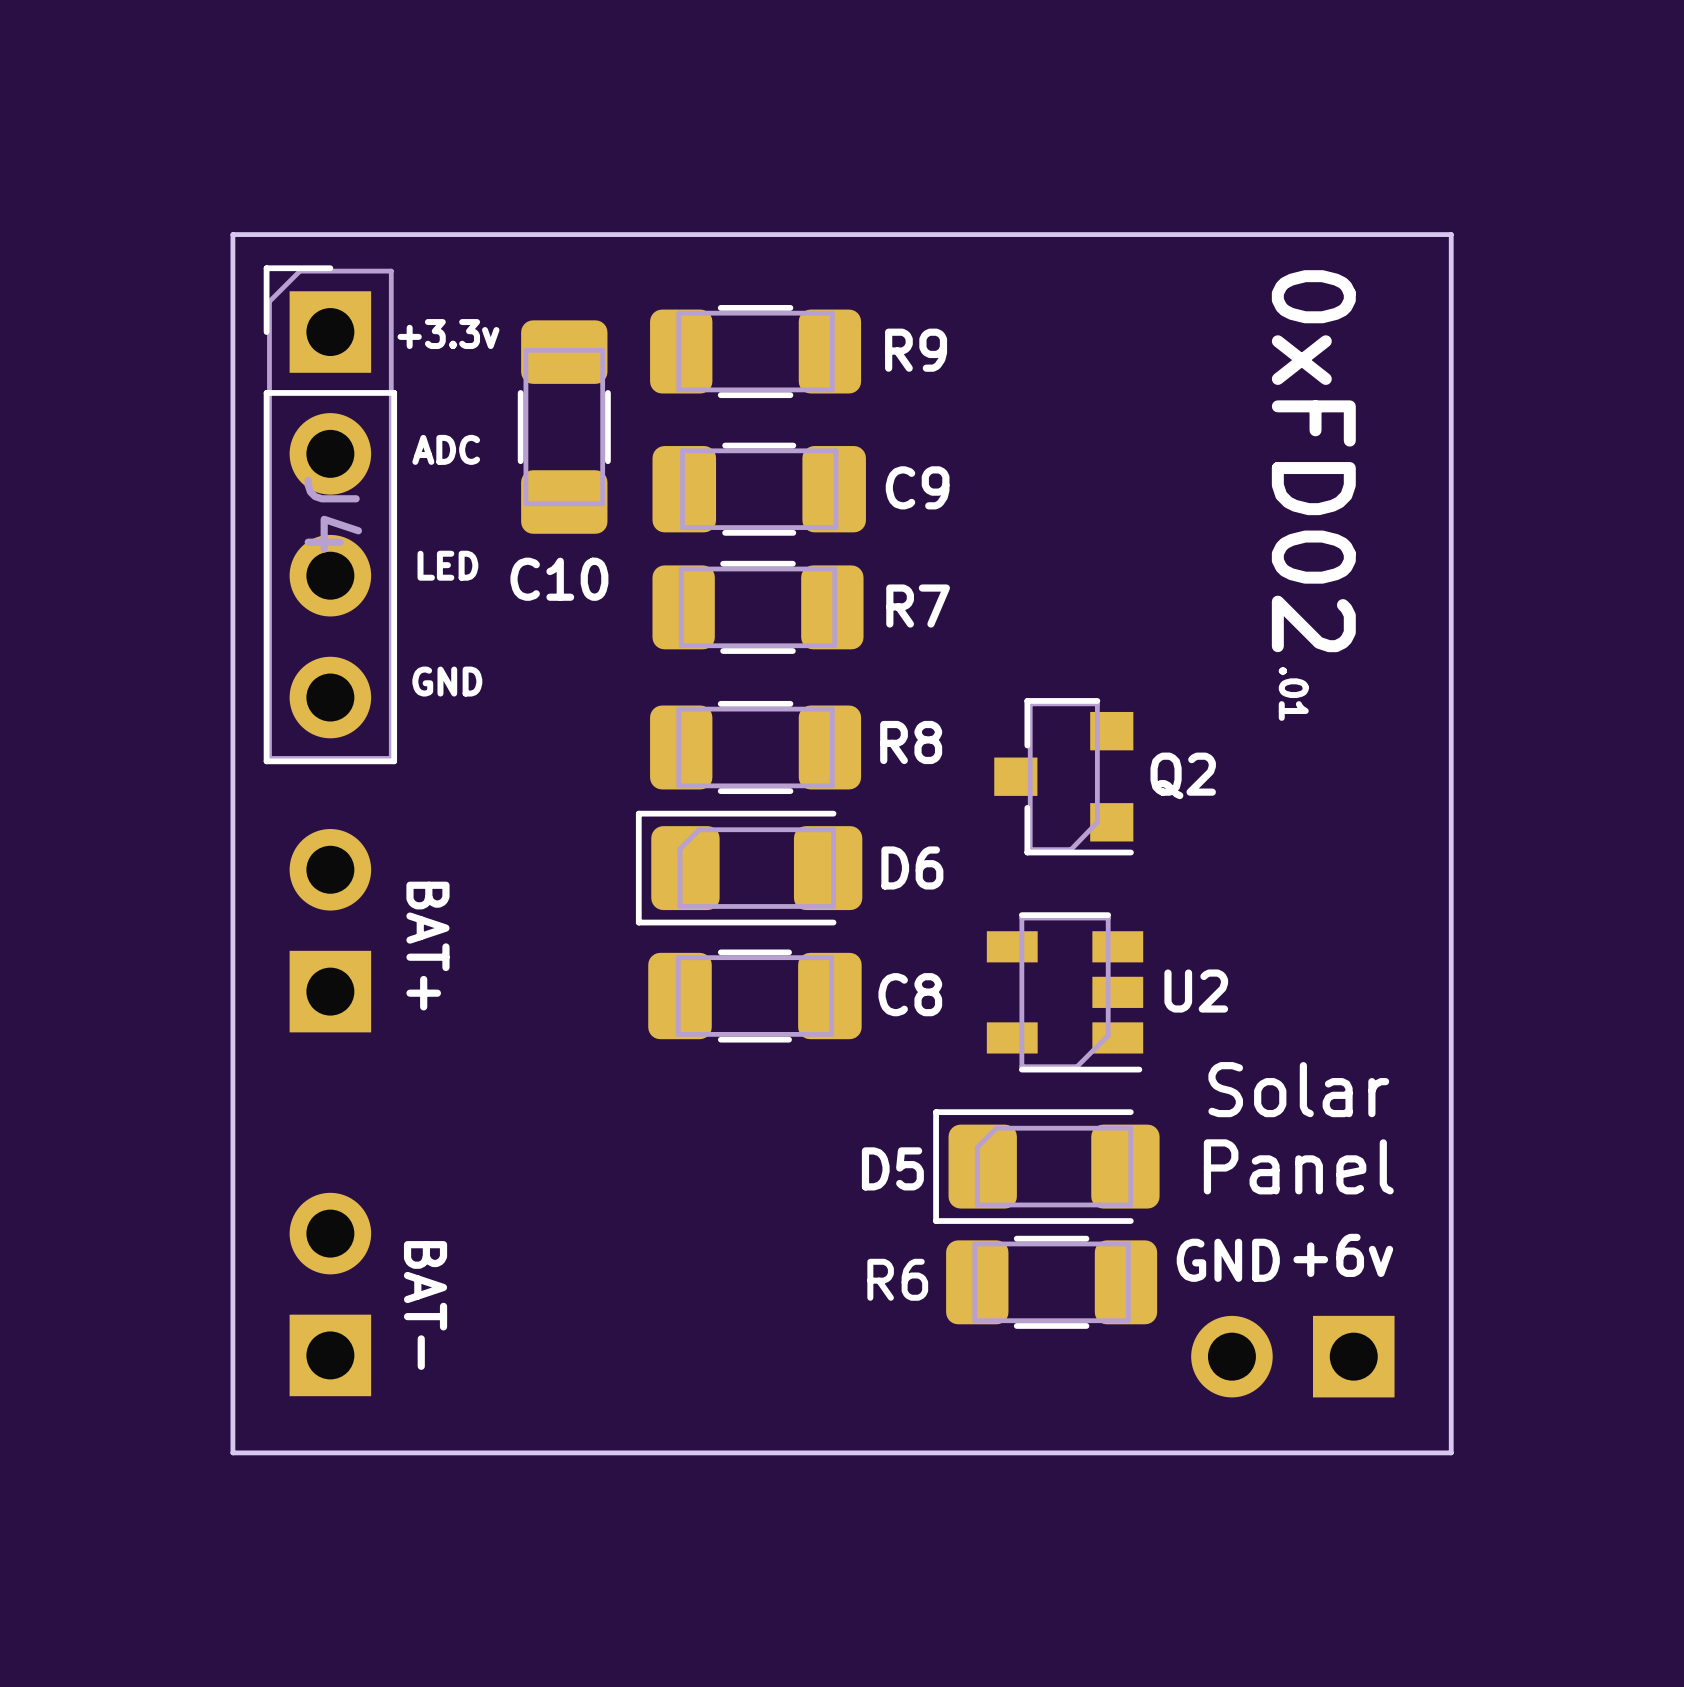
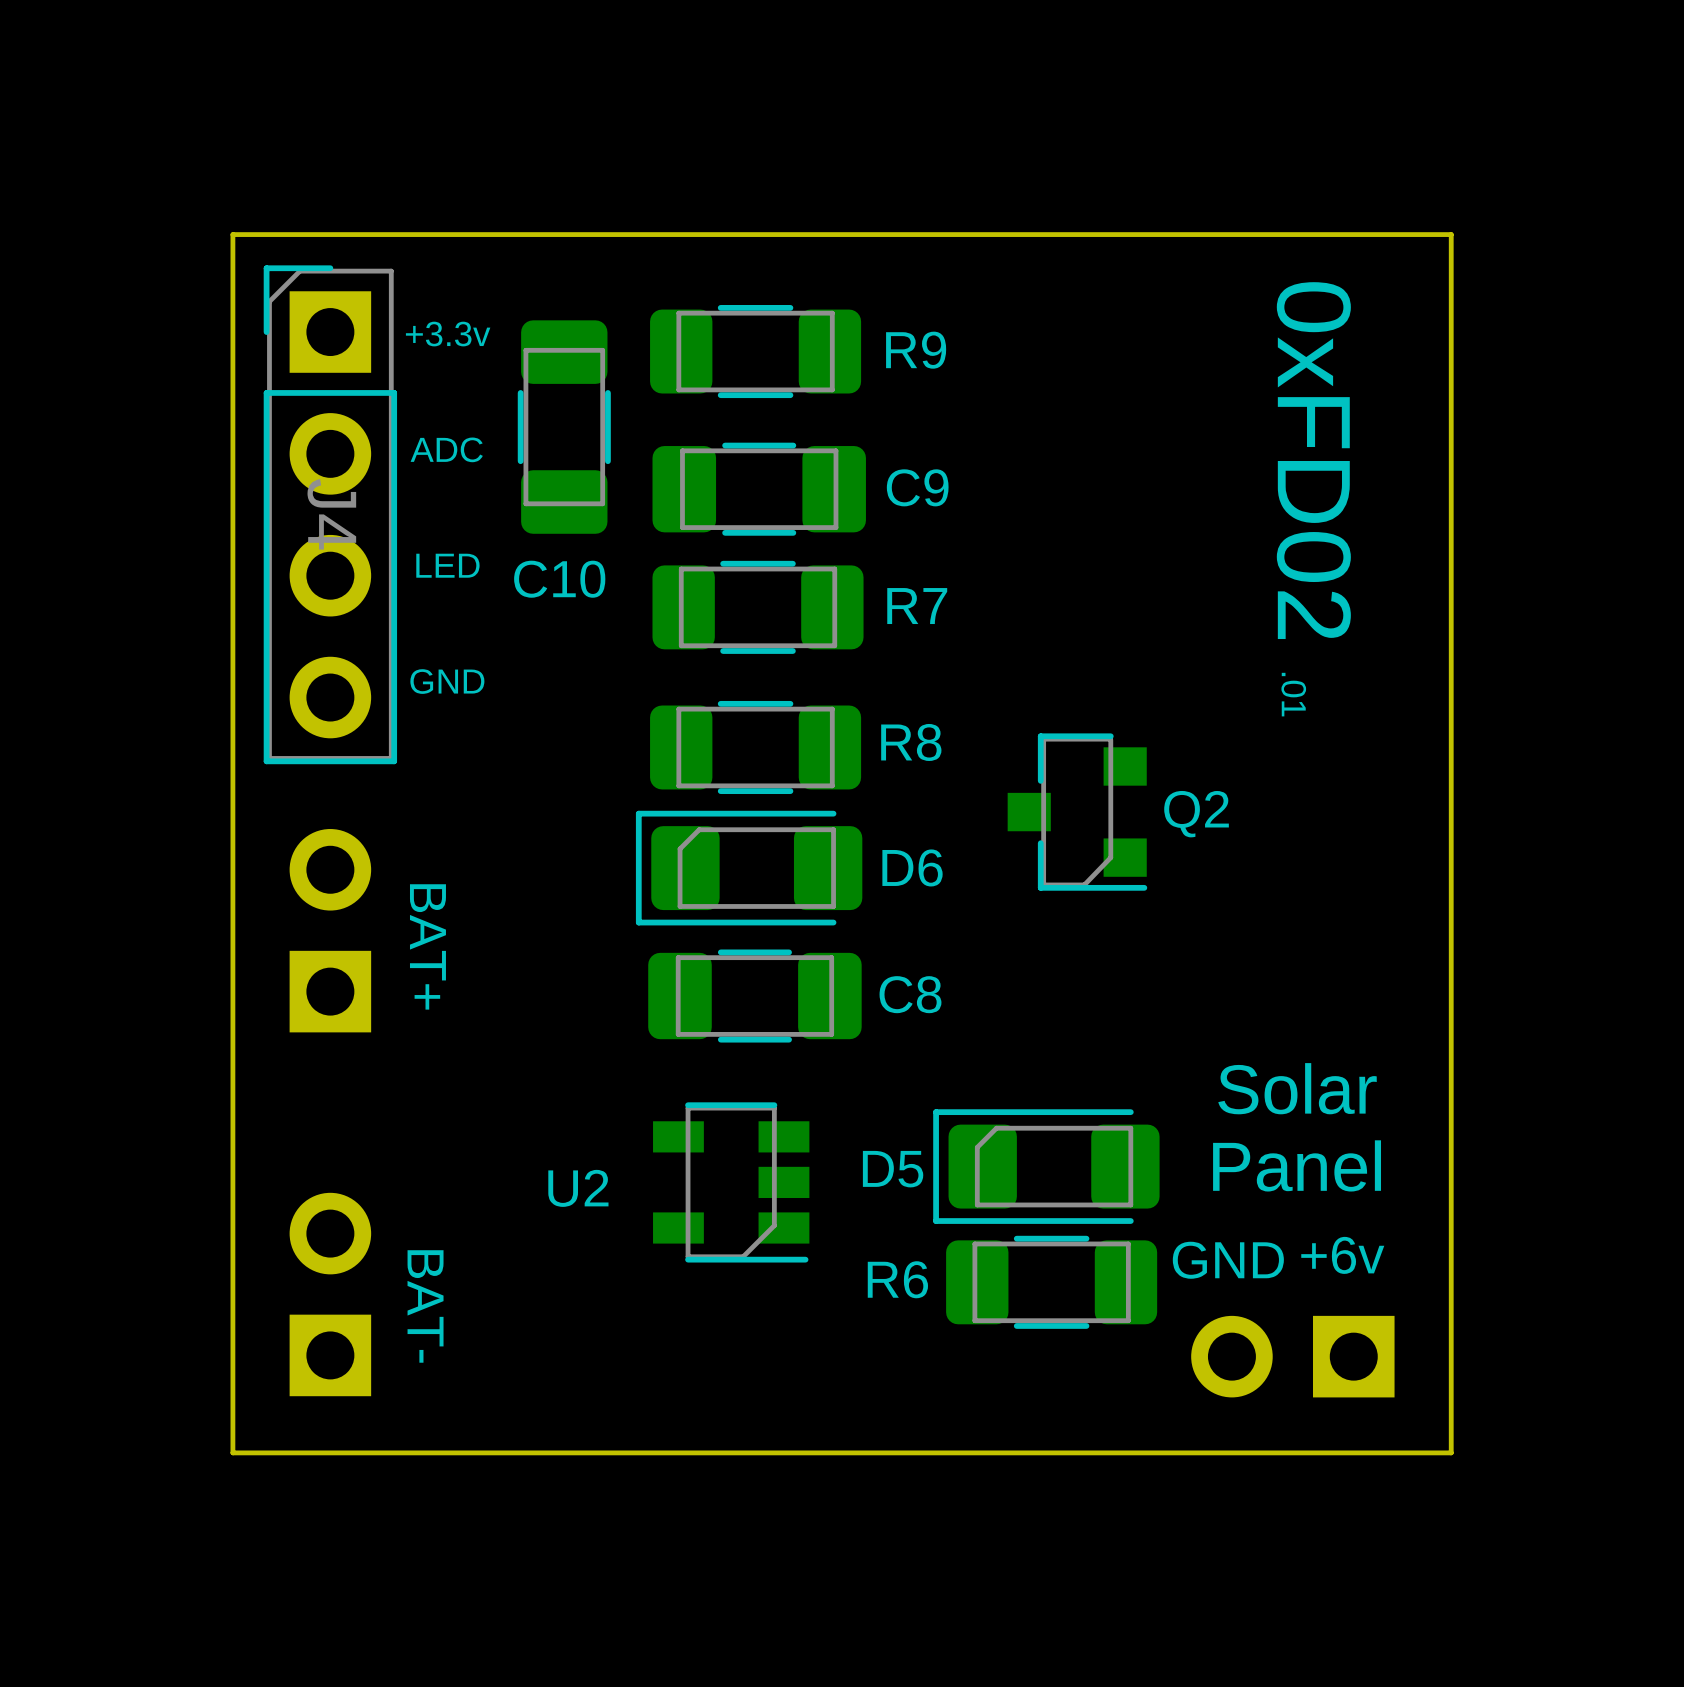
Q2 position: (1064, 776) -> (1077, 812)
U2 name position: U2 (1196, 991) -> U2 (578, 1188)
U2 position: (1065, 992) -> (731, 1182)

